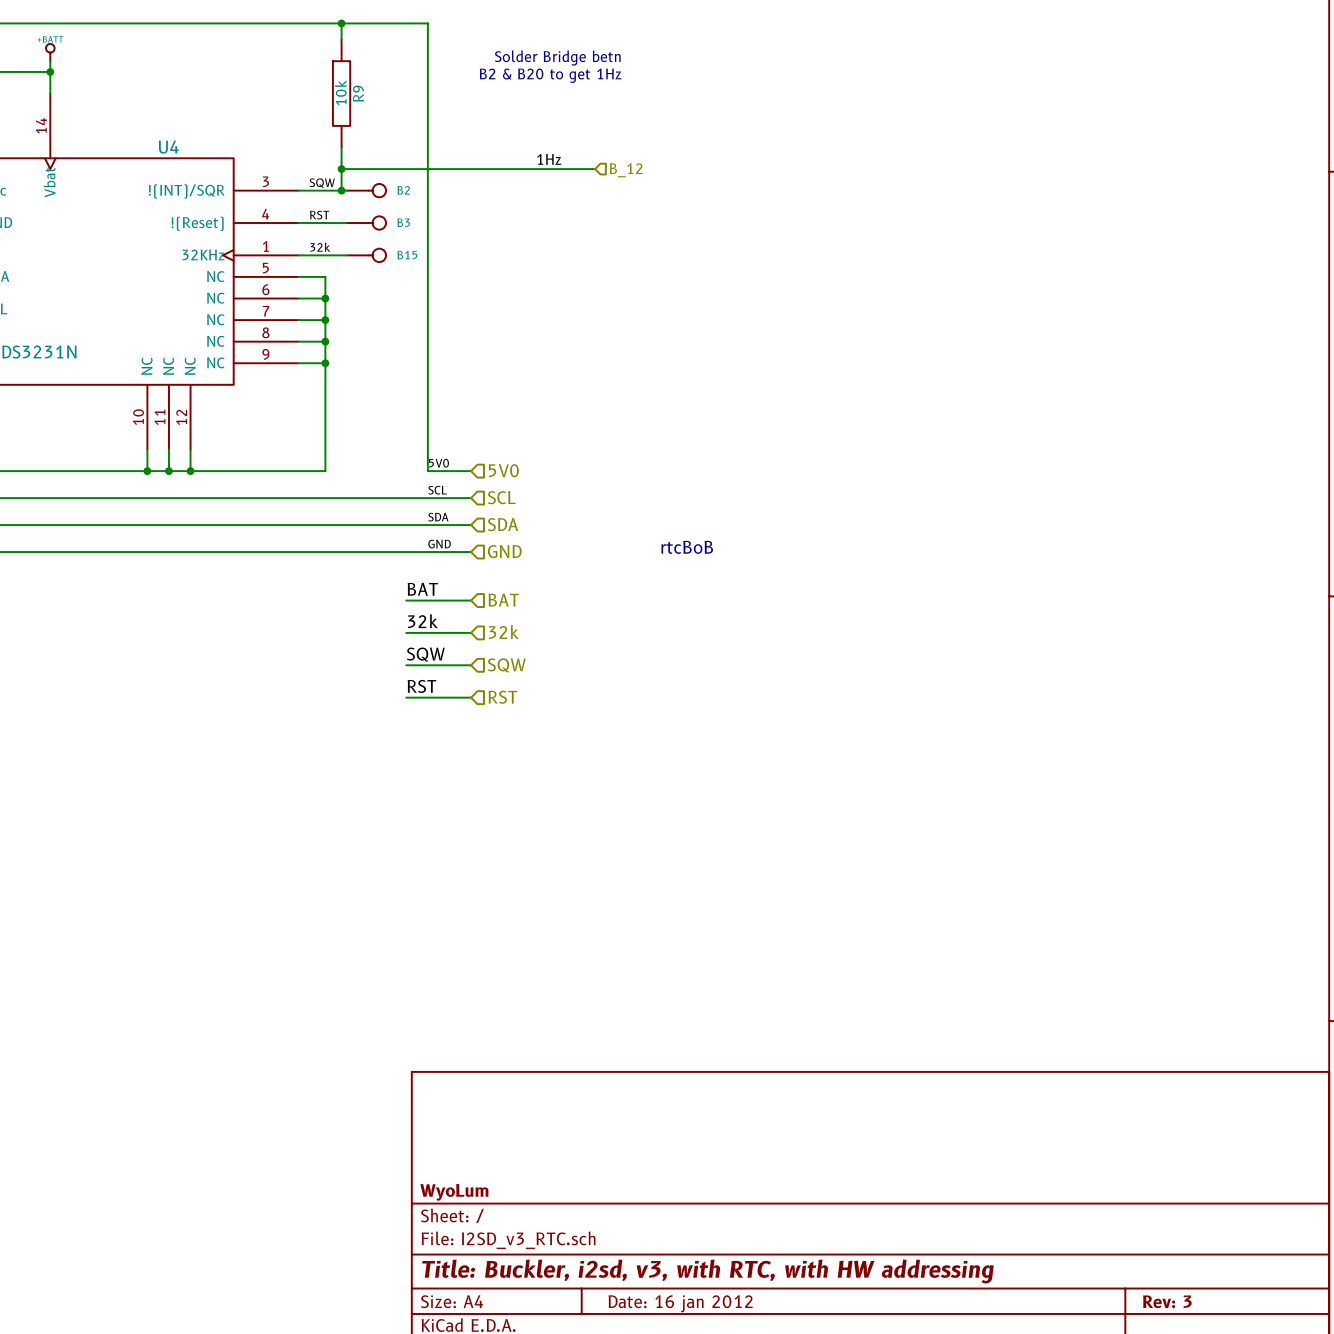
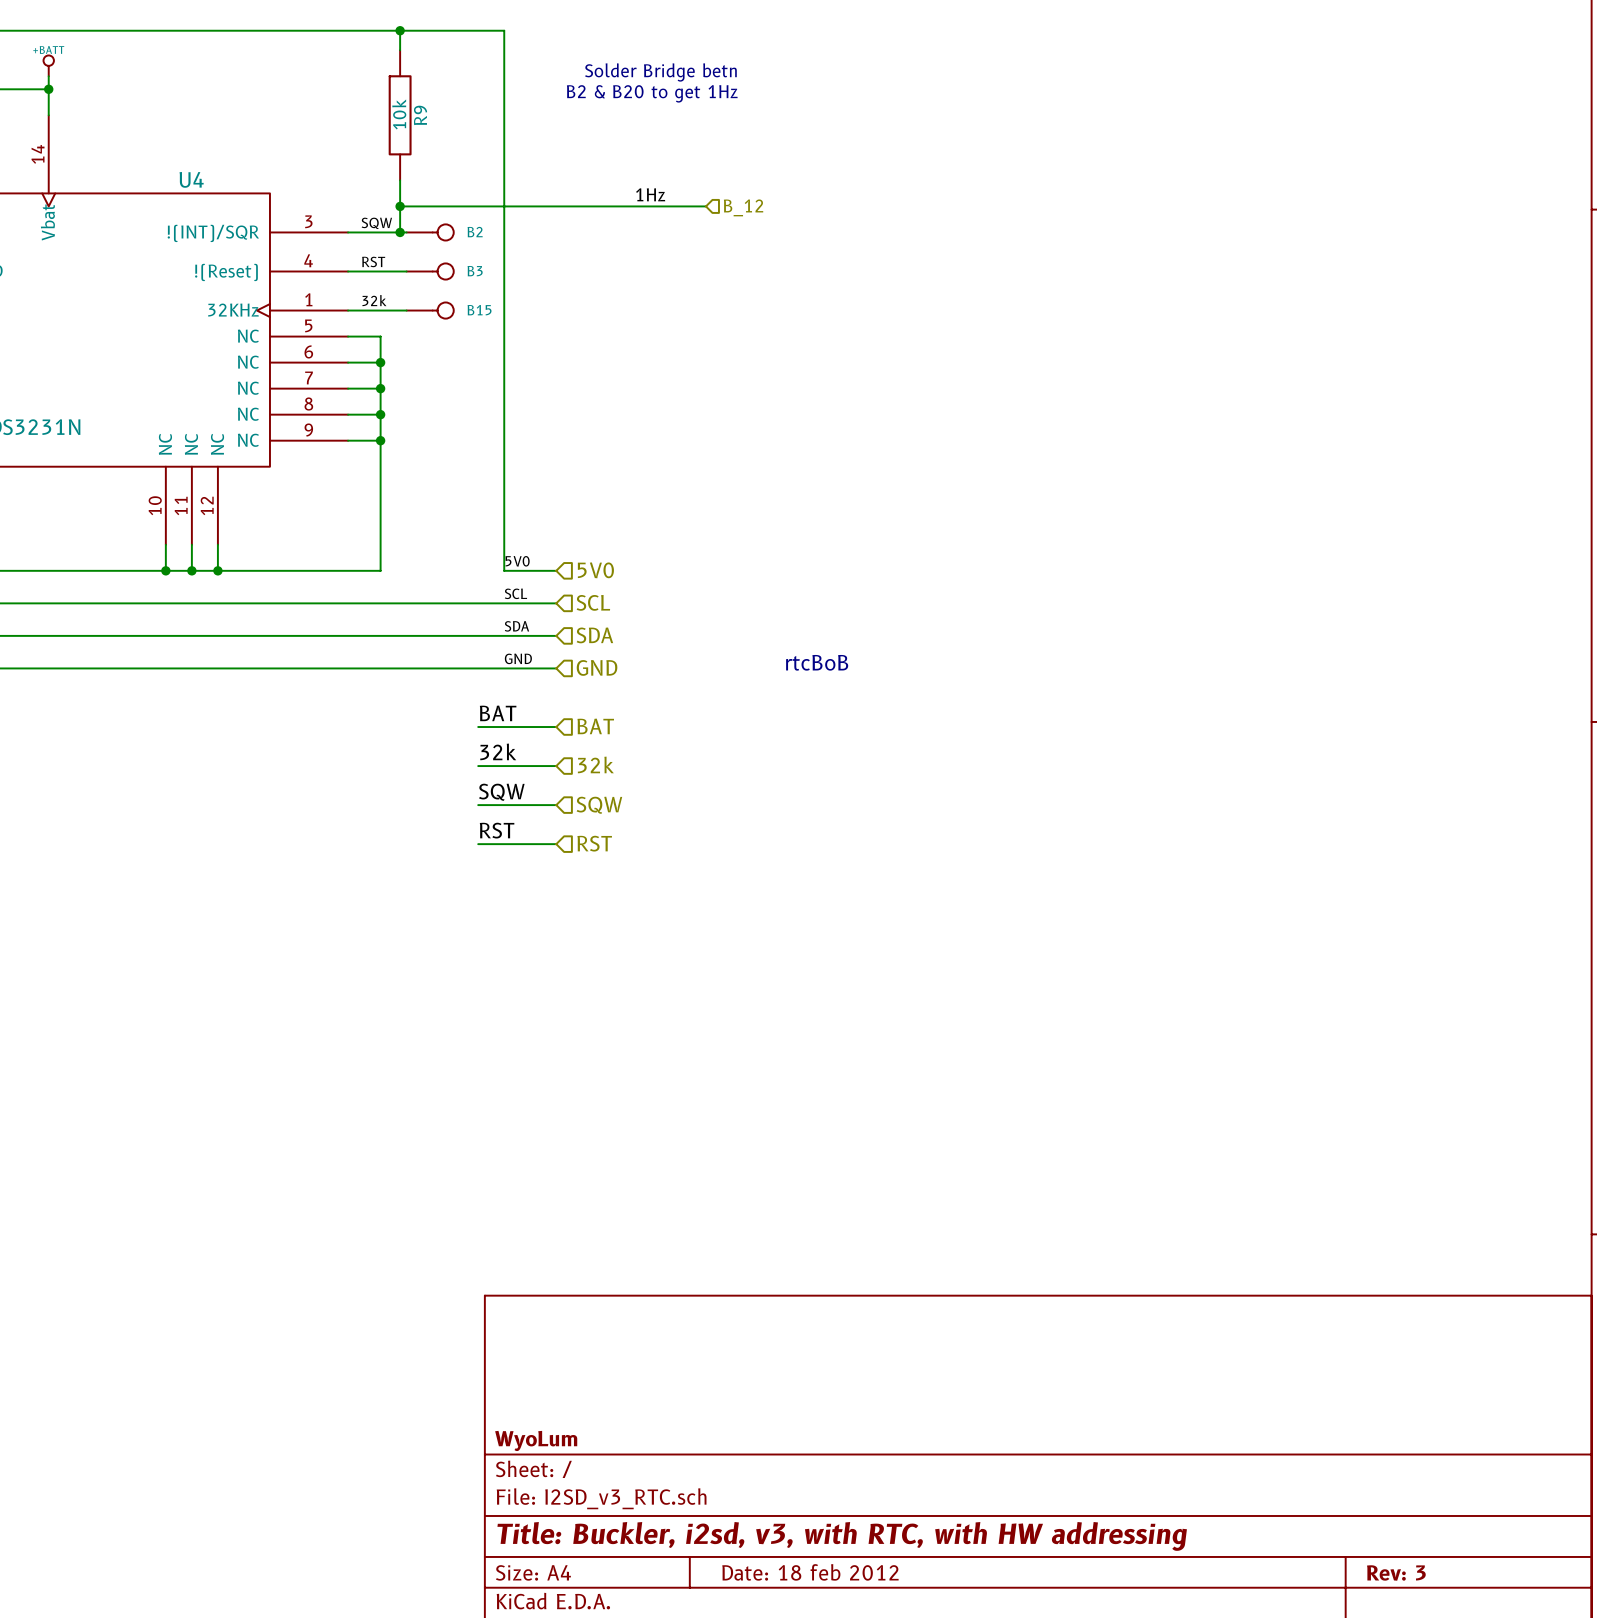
title block: Date: 16 jan 2012 (680, 1303) -> Date: 18 feb 2012 (810, 1572)

